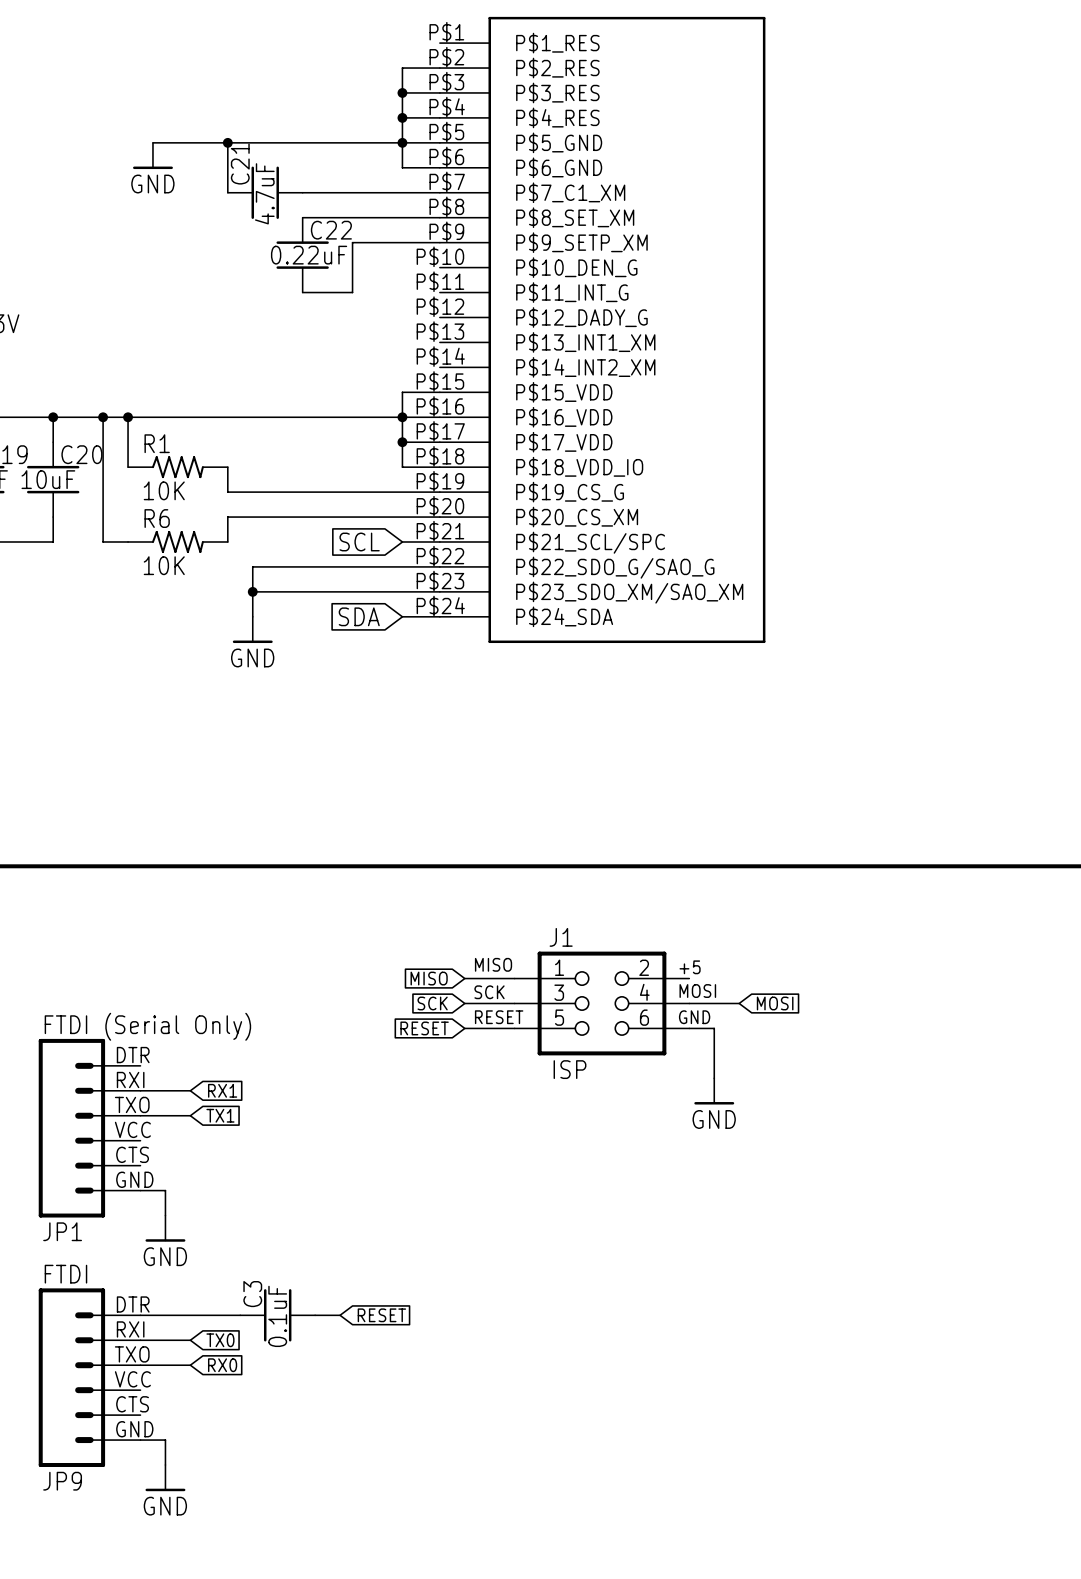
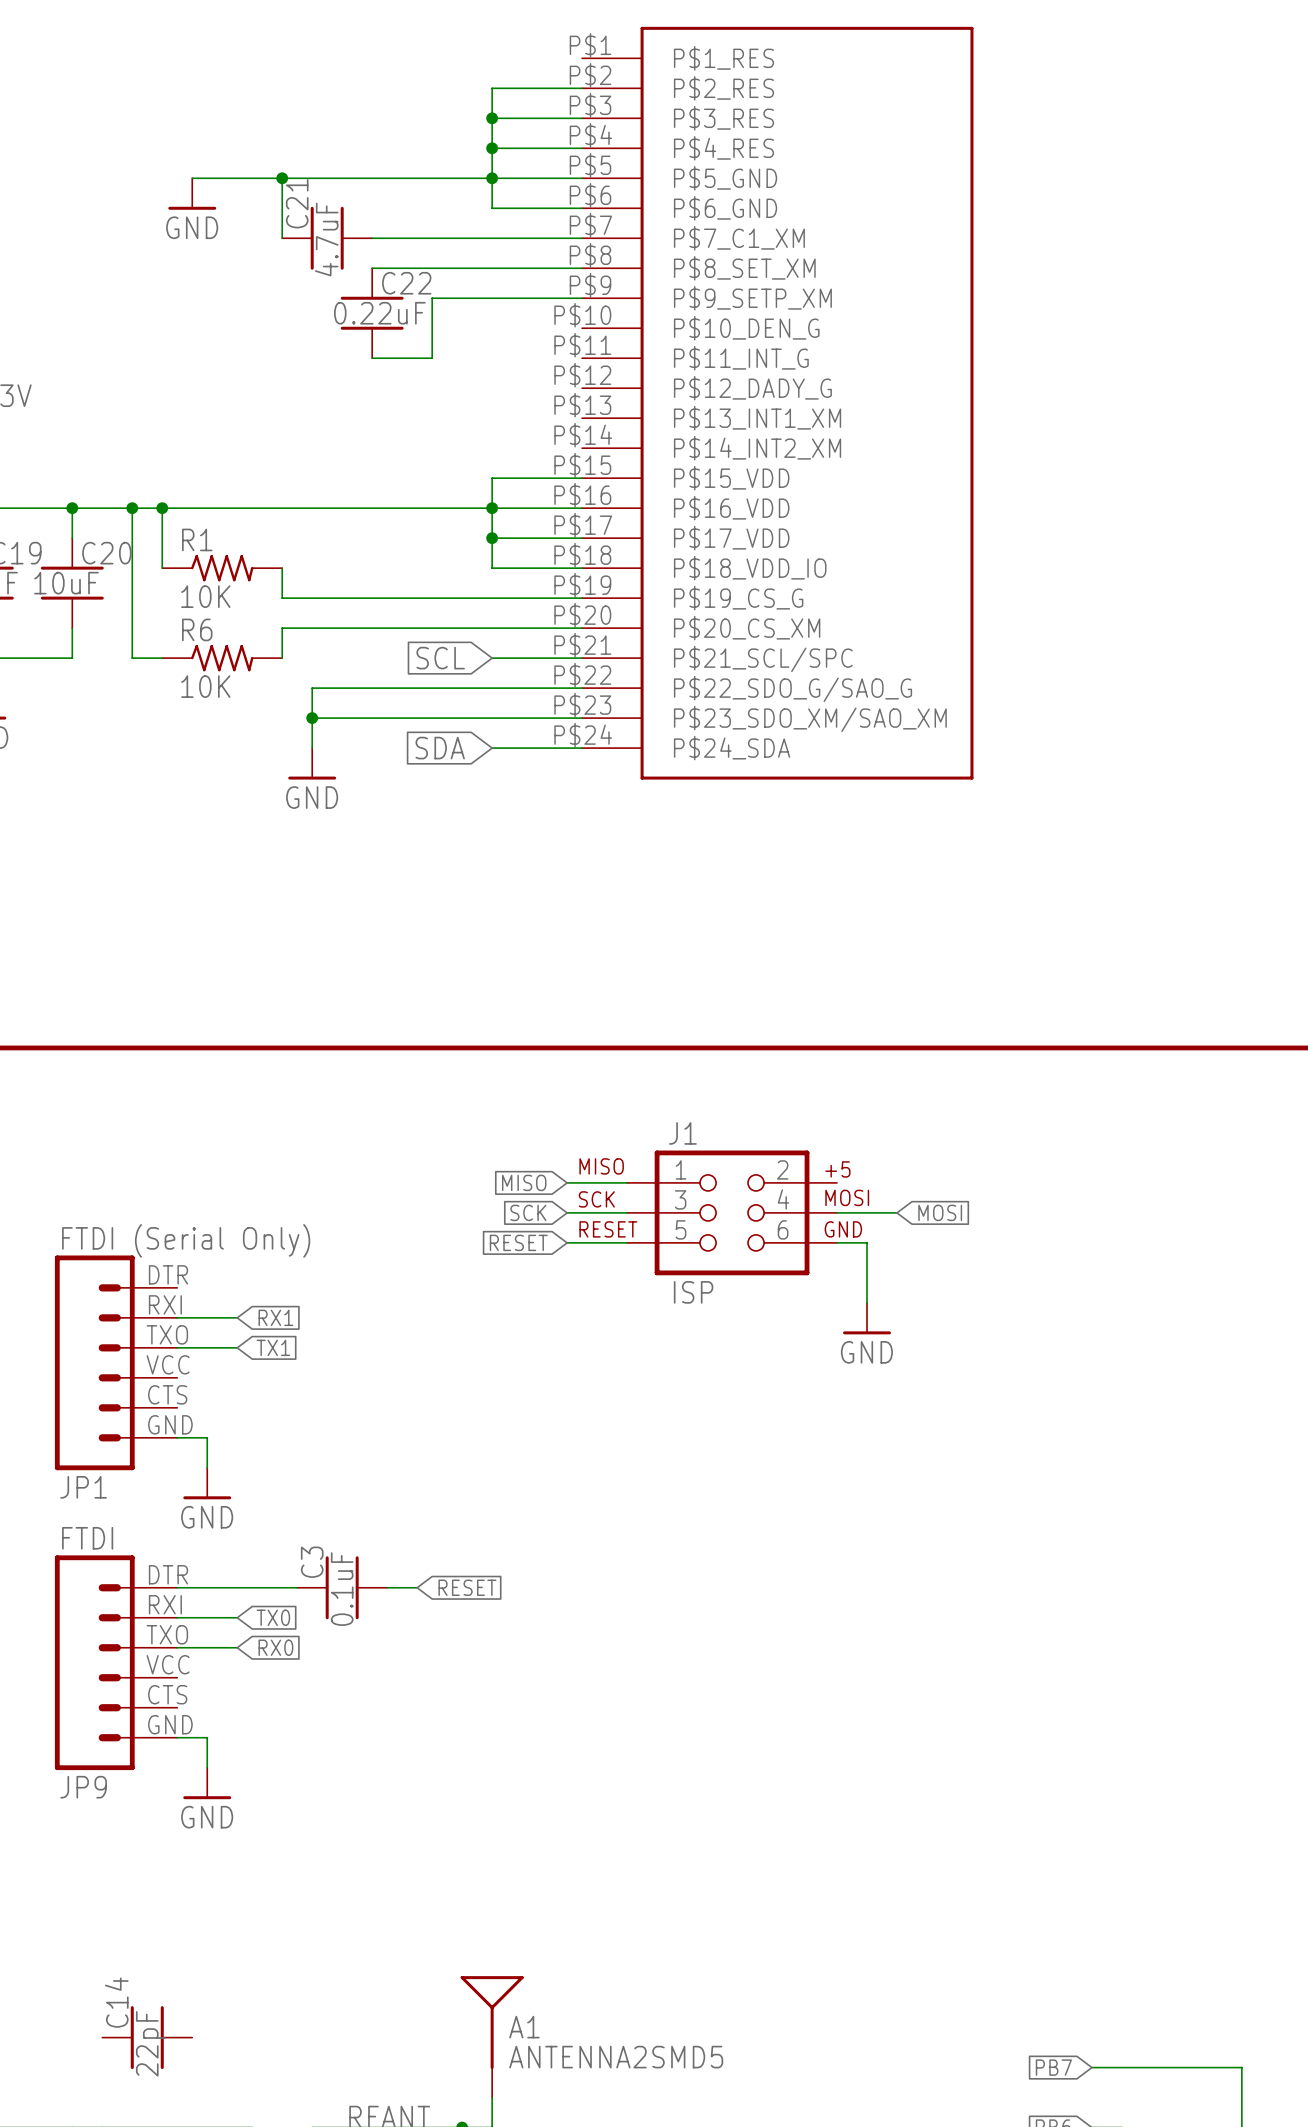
part position: (602, 329) -> (777, 403)

